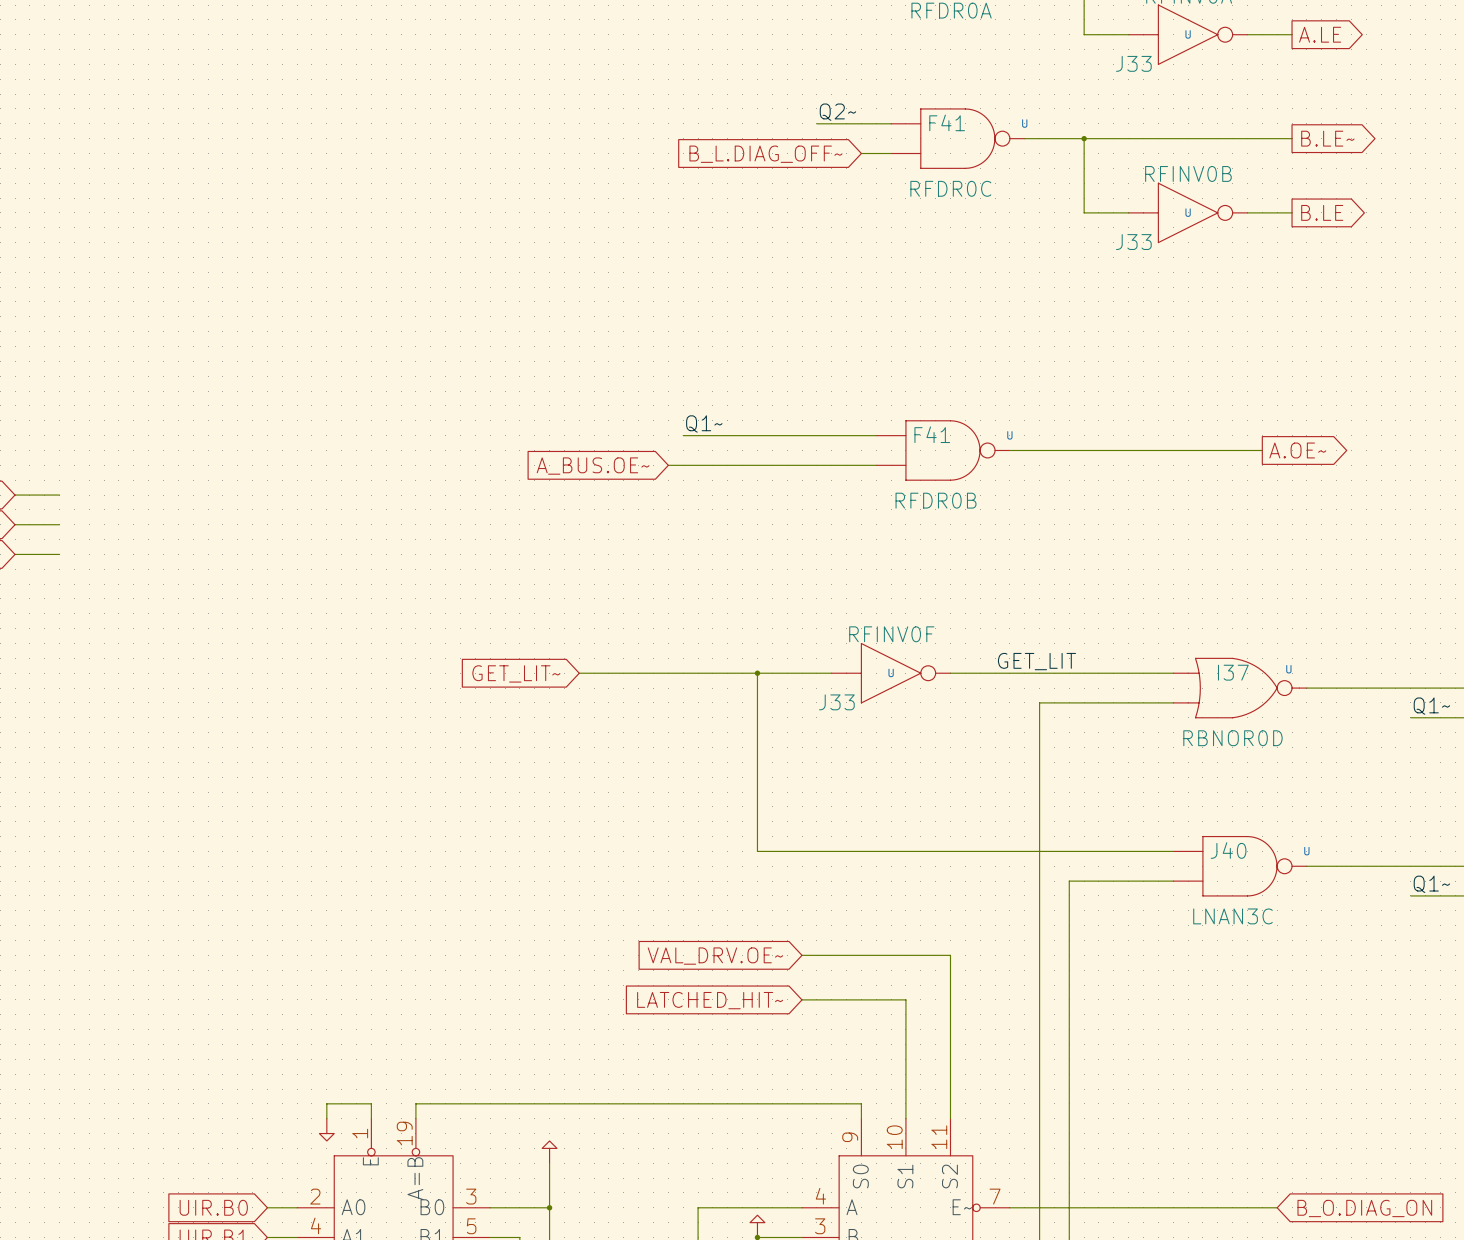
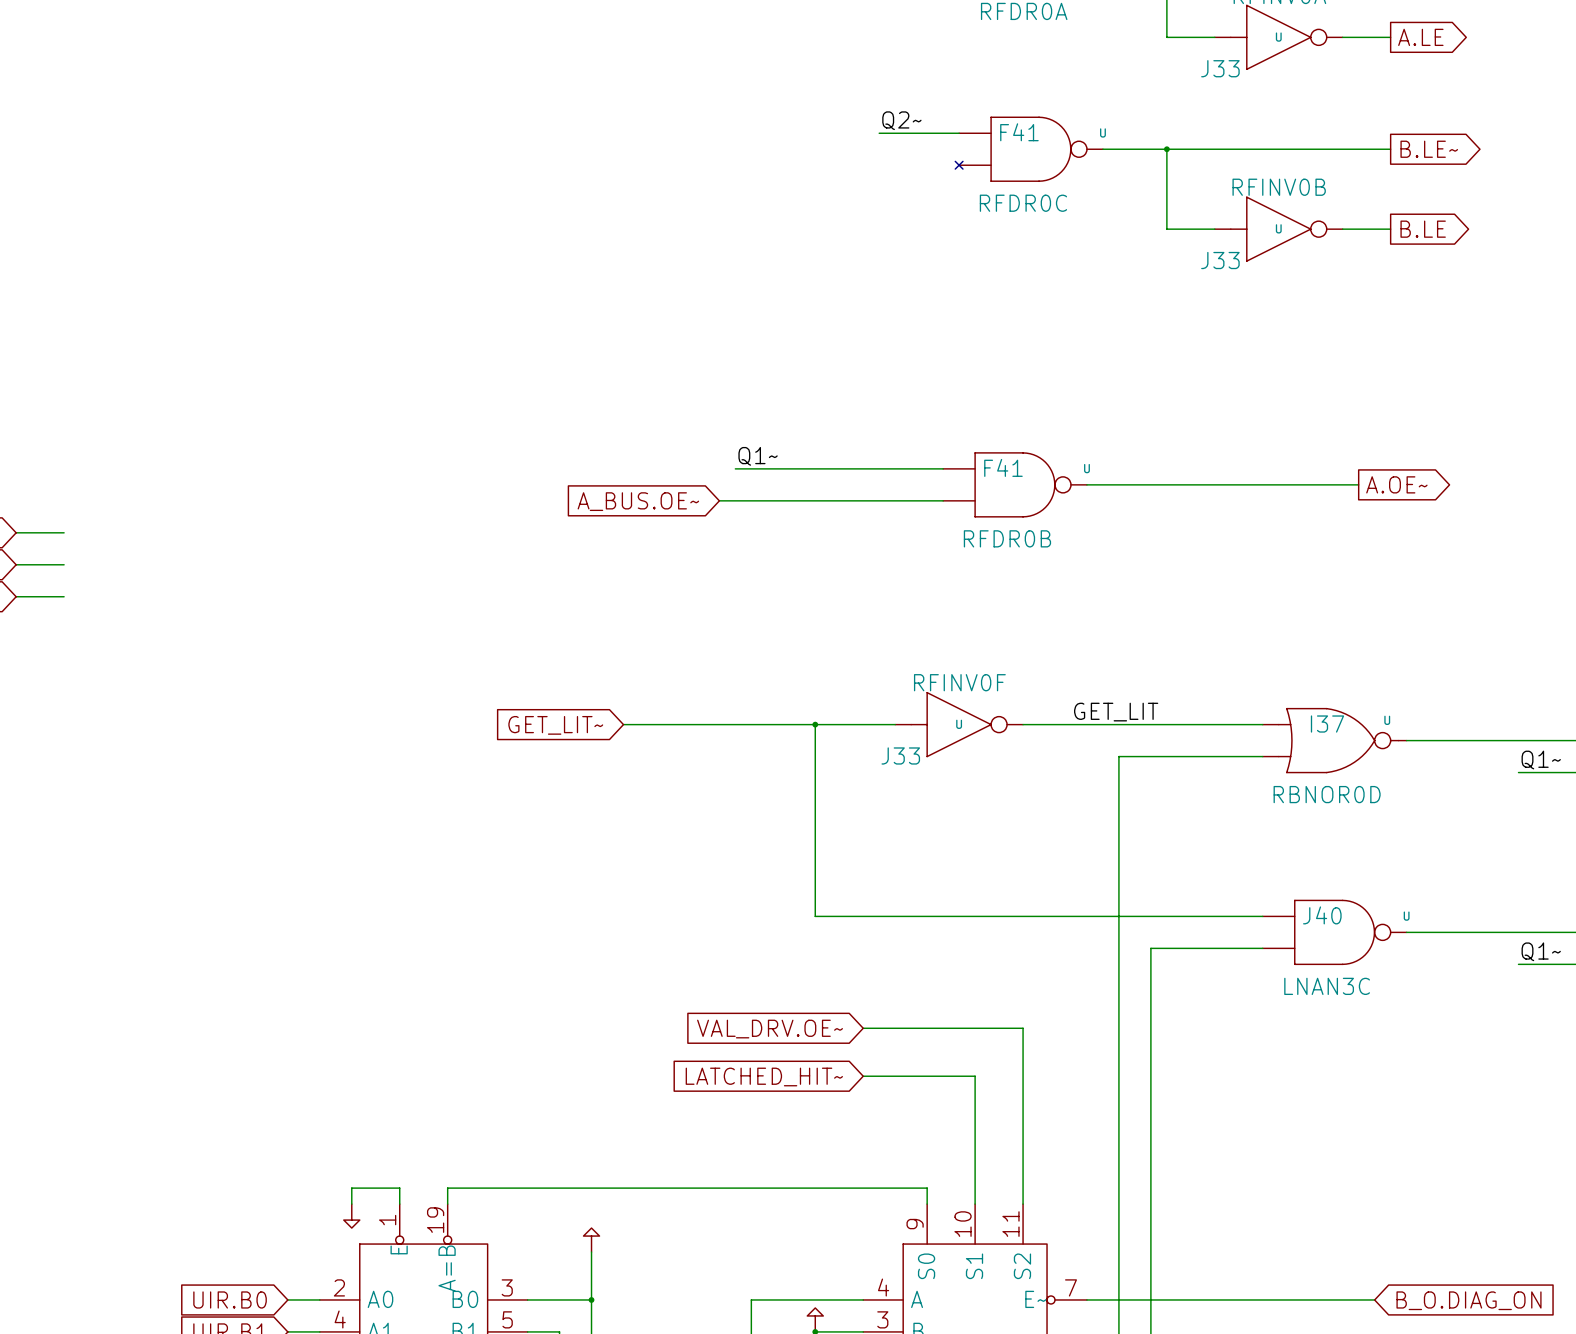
wire: (861, 153) (891, 153) -> none
no-connect mark: none -> (959, 165)
global label: B_L.DIAG_OFF~ (765, 154) -> none

